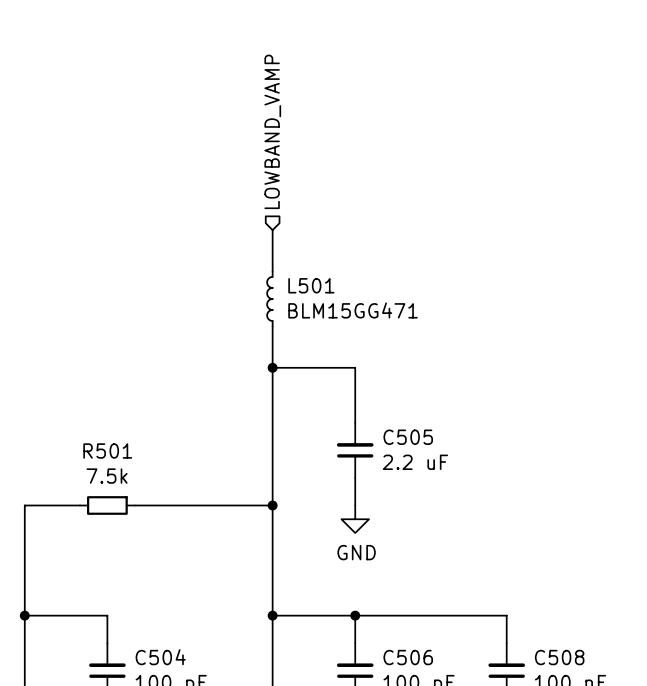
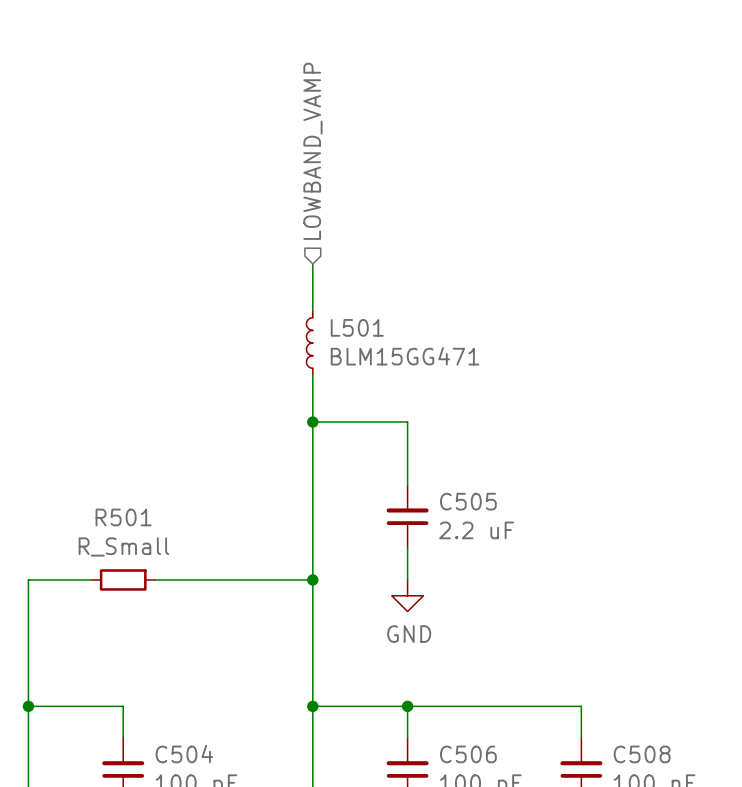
R501 value: 7.5k (107, 476) -> R_Small (123, 546)

